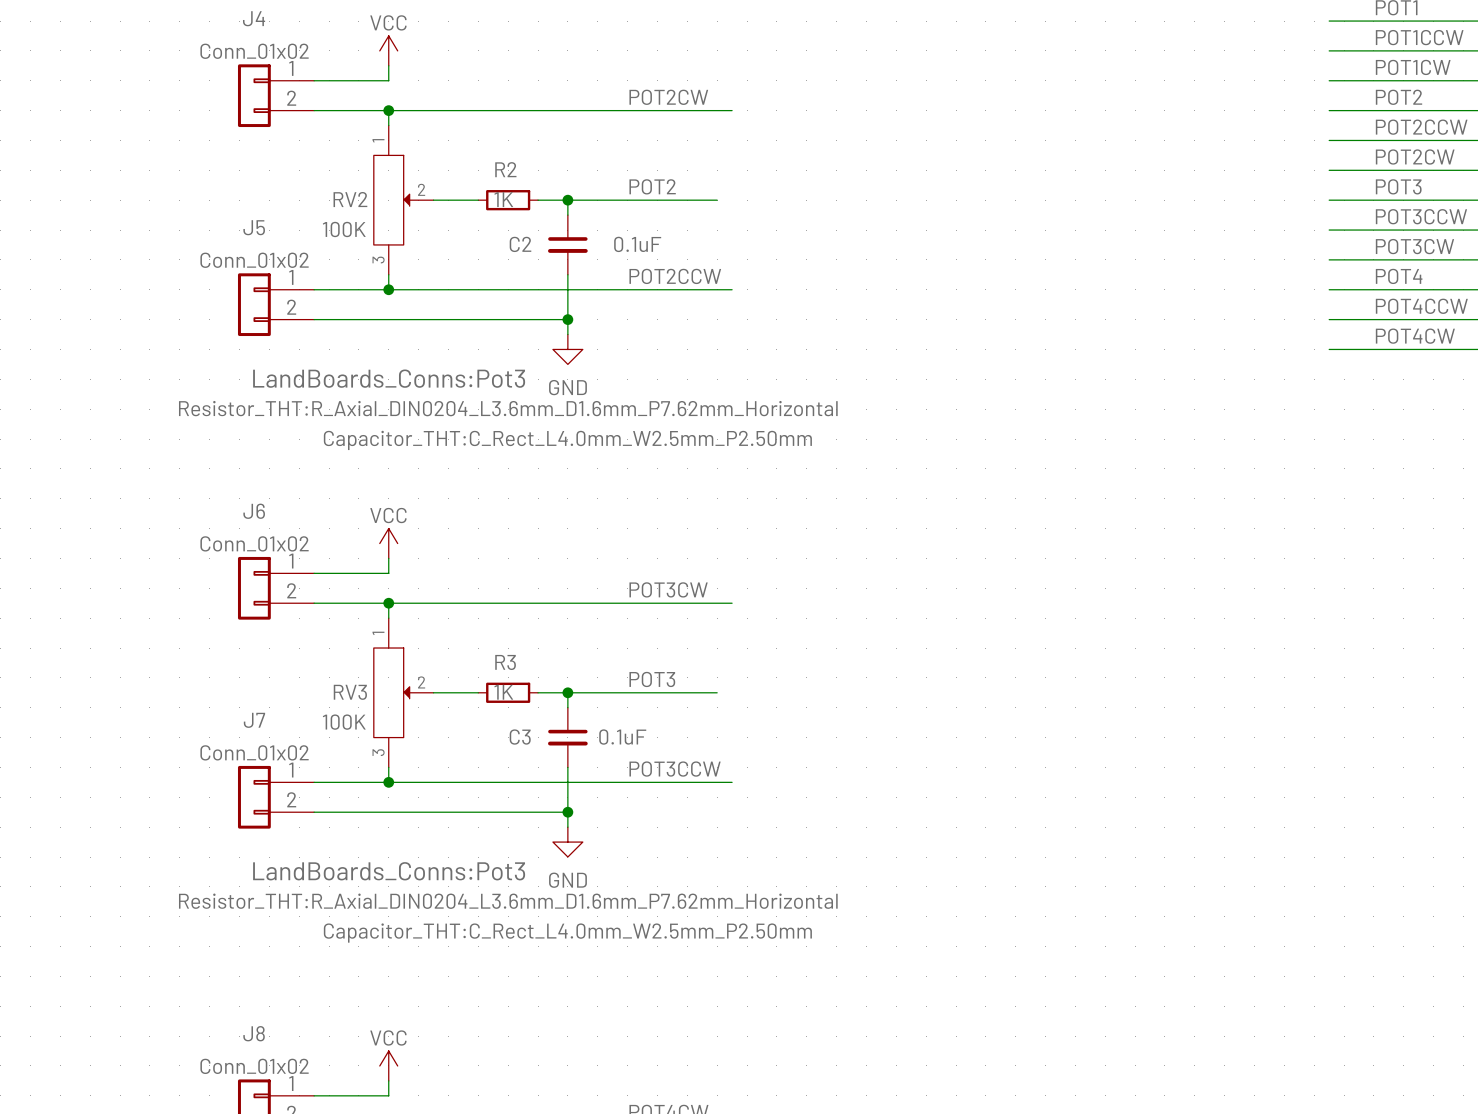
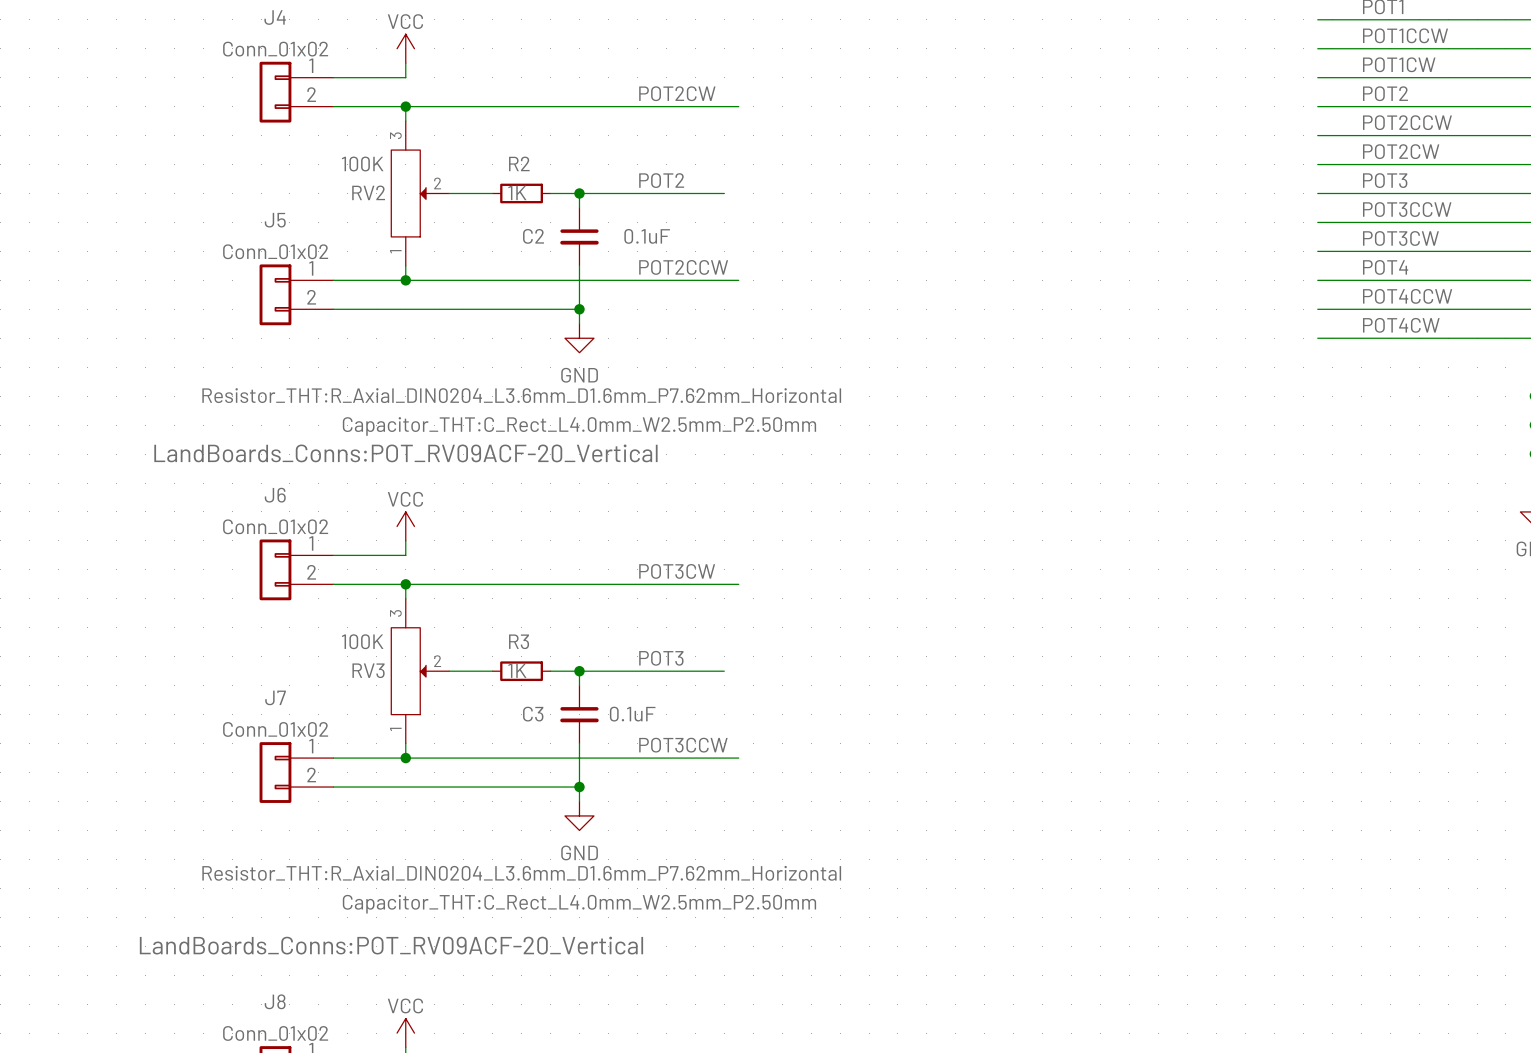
RV2 flip: as is (391, 200) -> up-down (408, 193)
RV2 text: LandBoards_Conns:Pot3 (389, 378) -> LandBoards_Conns:POT_RV09ACF-20_Vertical (405, 453)
RV3 flip: as is (391, 692) -> up-down (408, 671)
RV3 text: LandBoards_Conns:Pot3 (389, 871) -> LandBoards_Conns:POT_RV09ACF-20_Vertical (391, 945)

